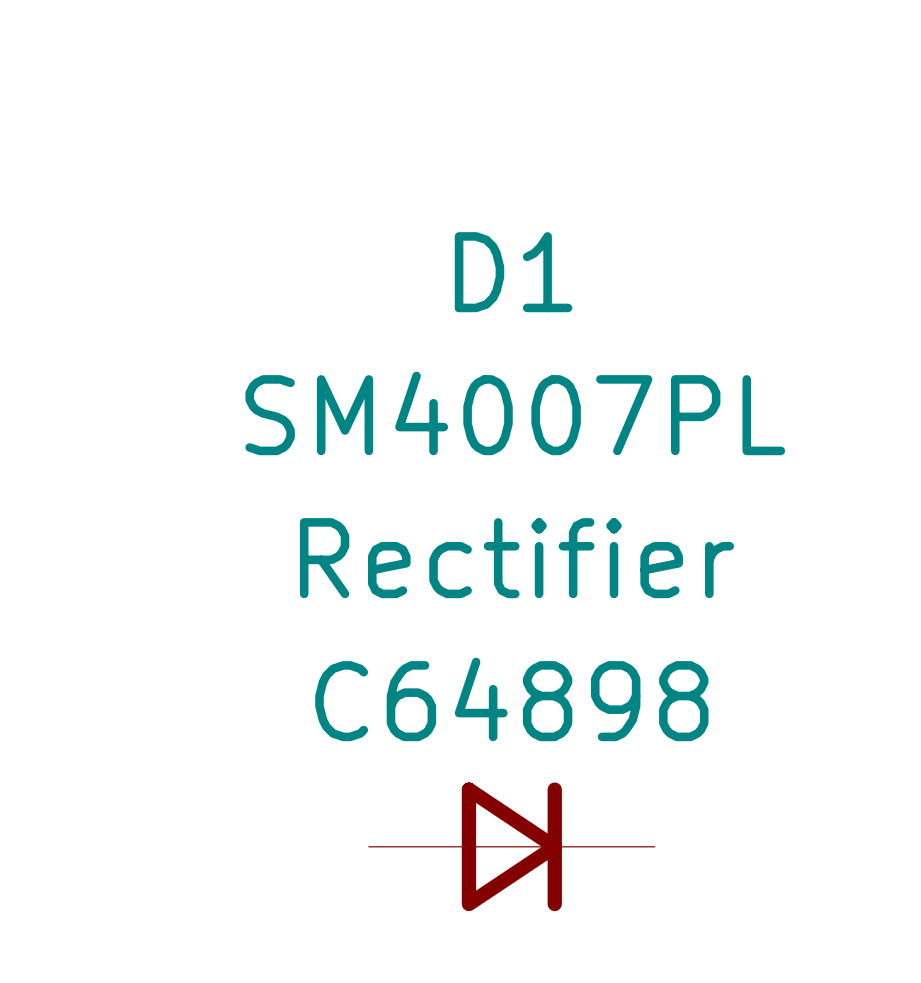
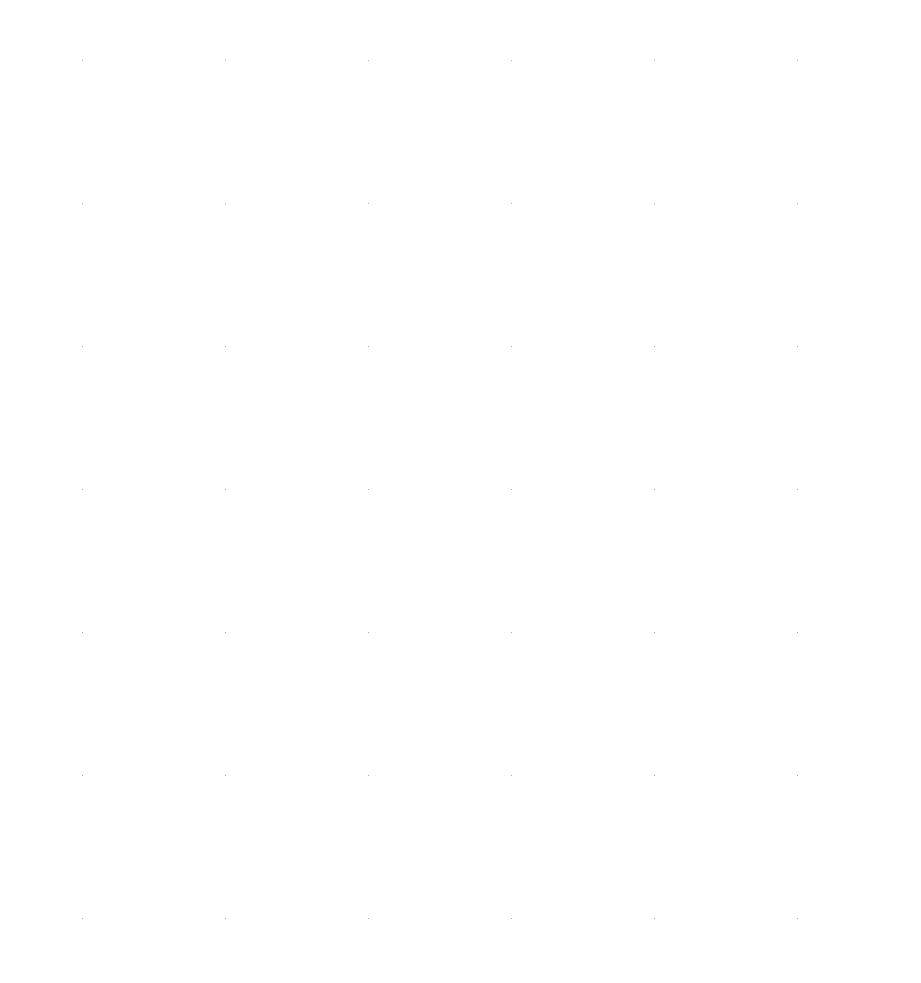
D1: SM4007PL (511, 846) -> none

